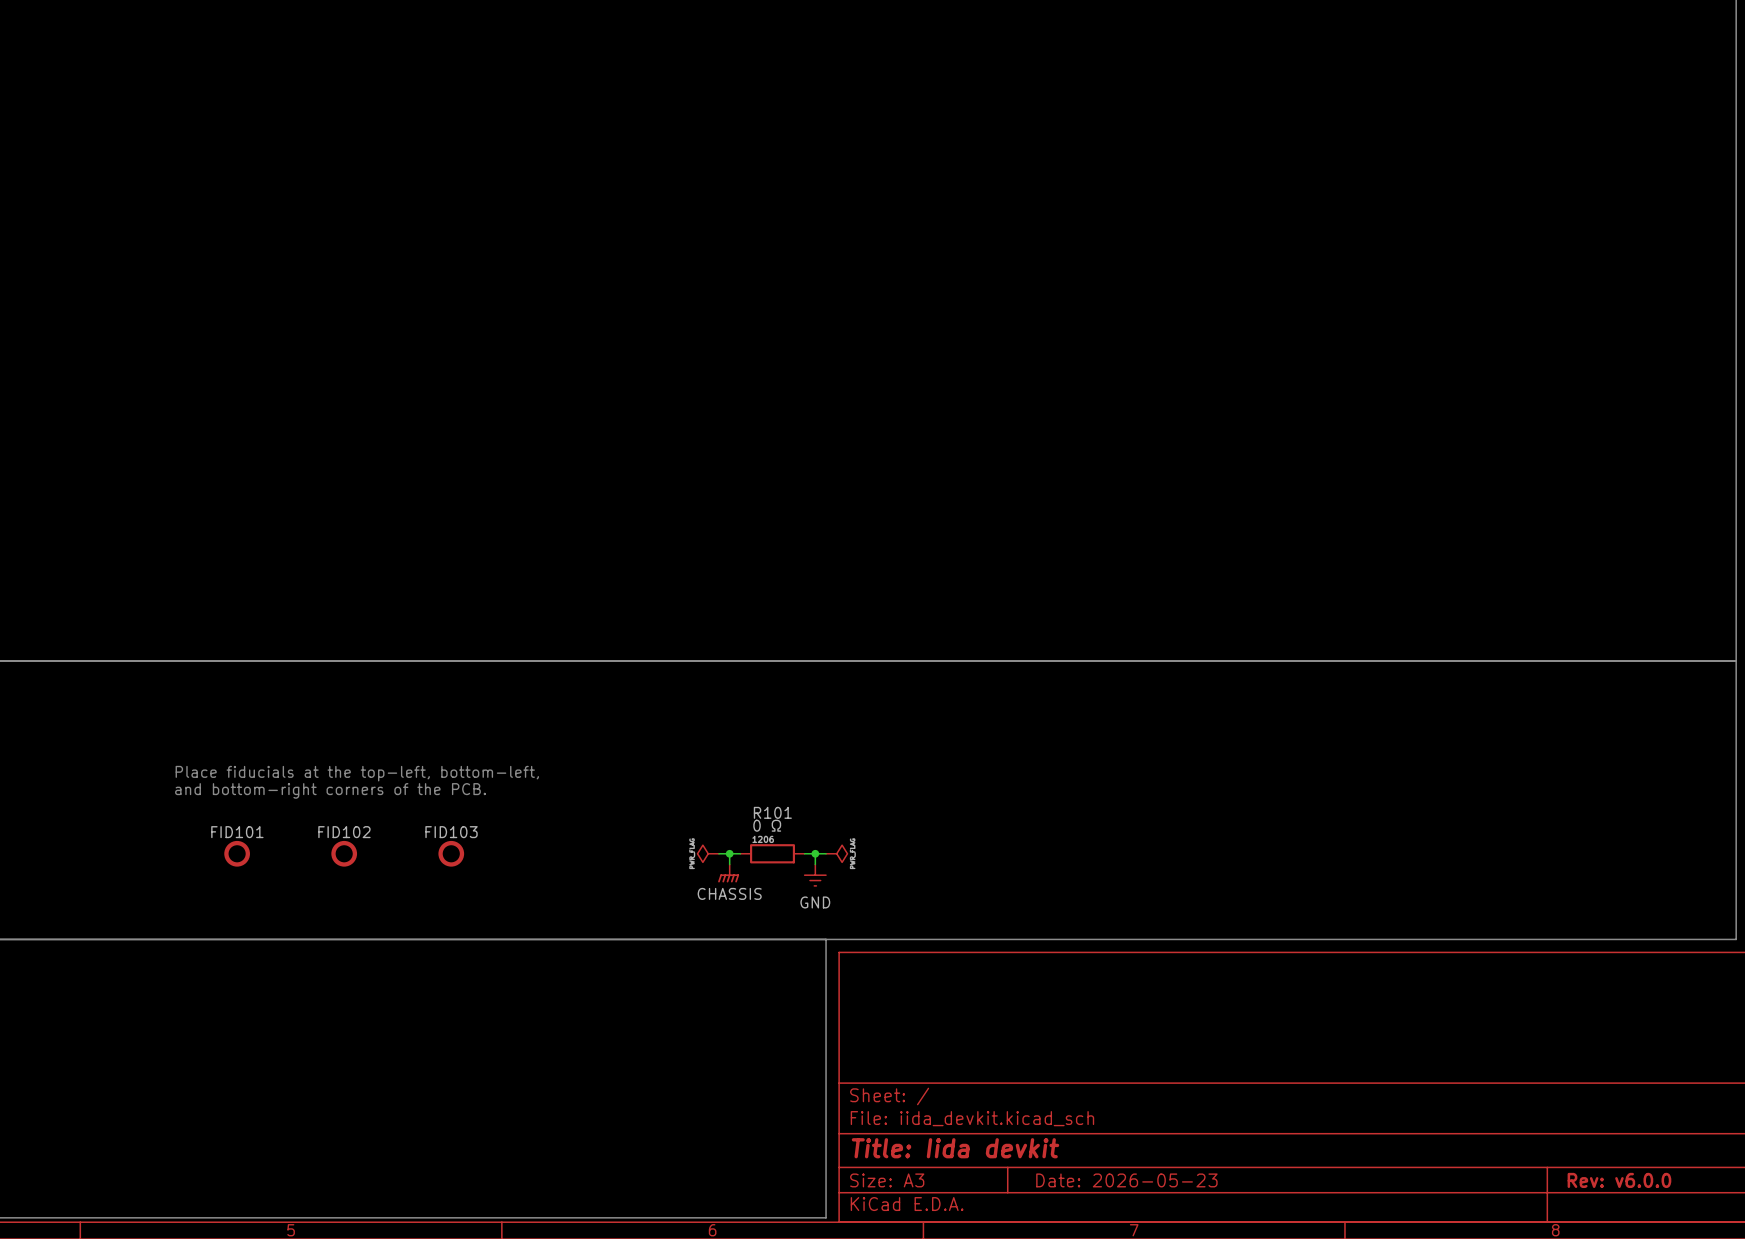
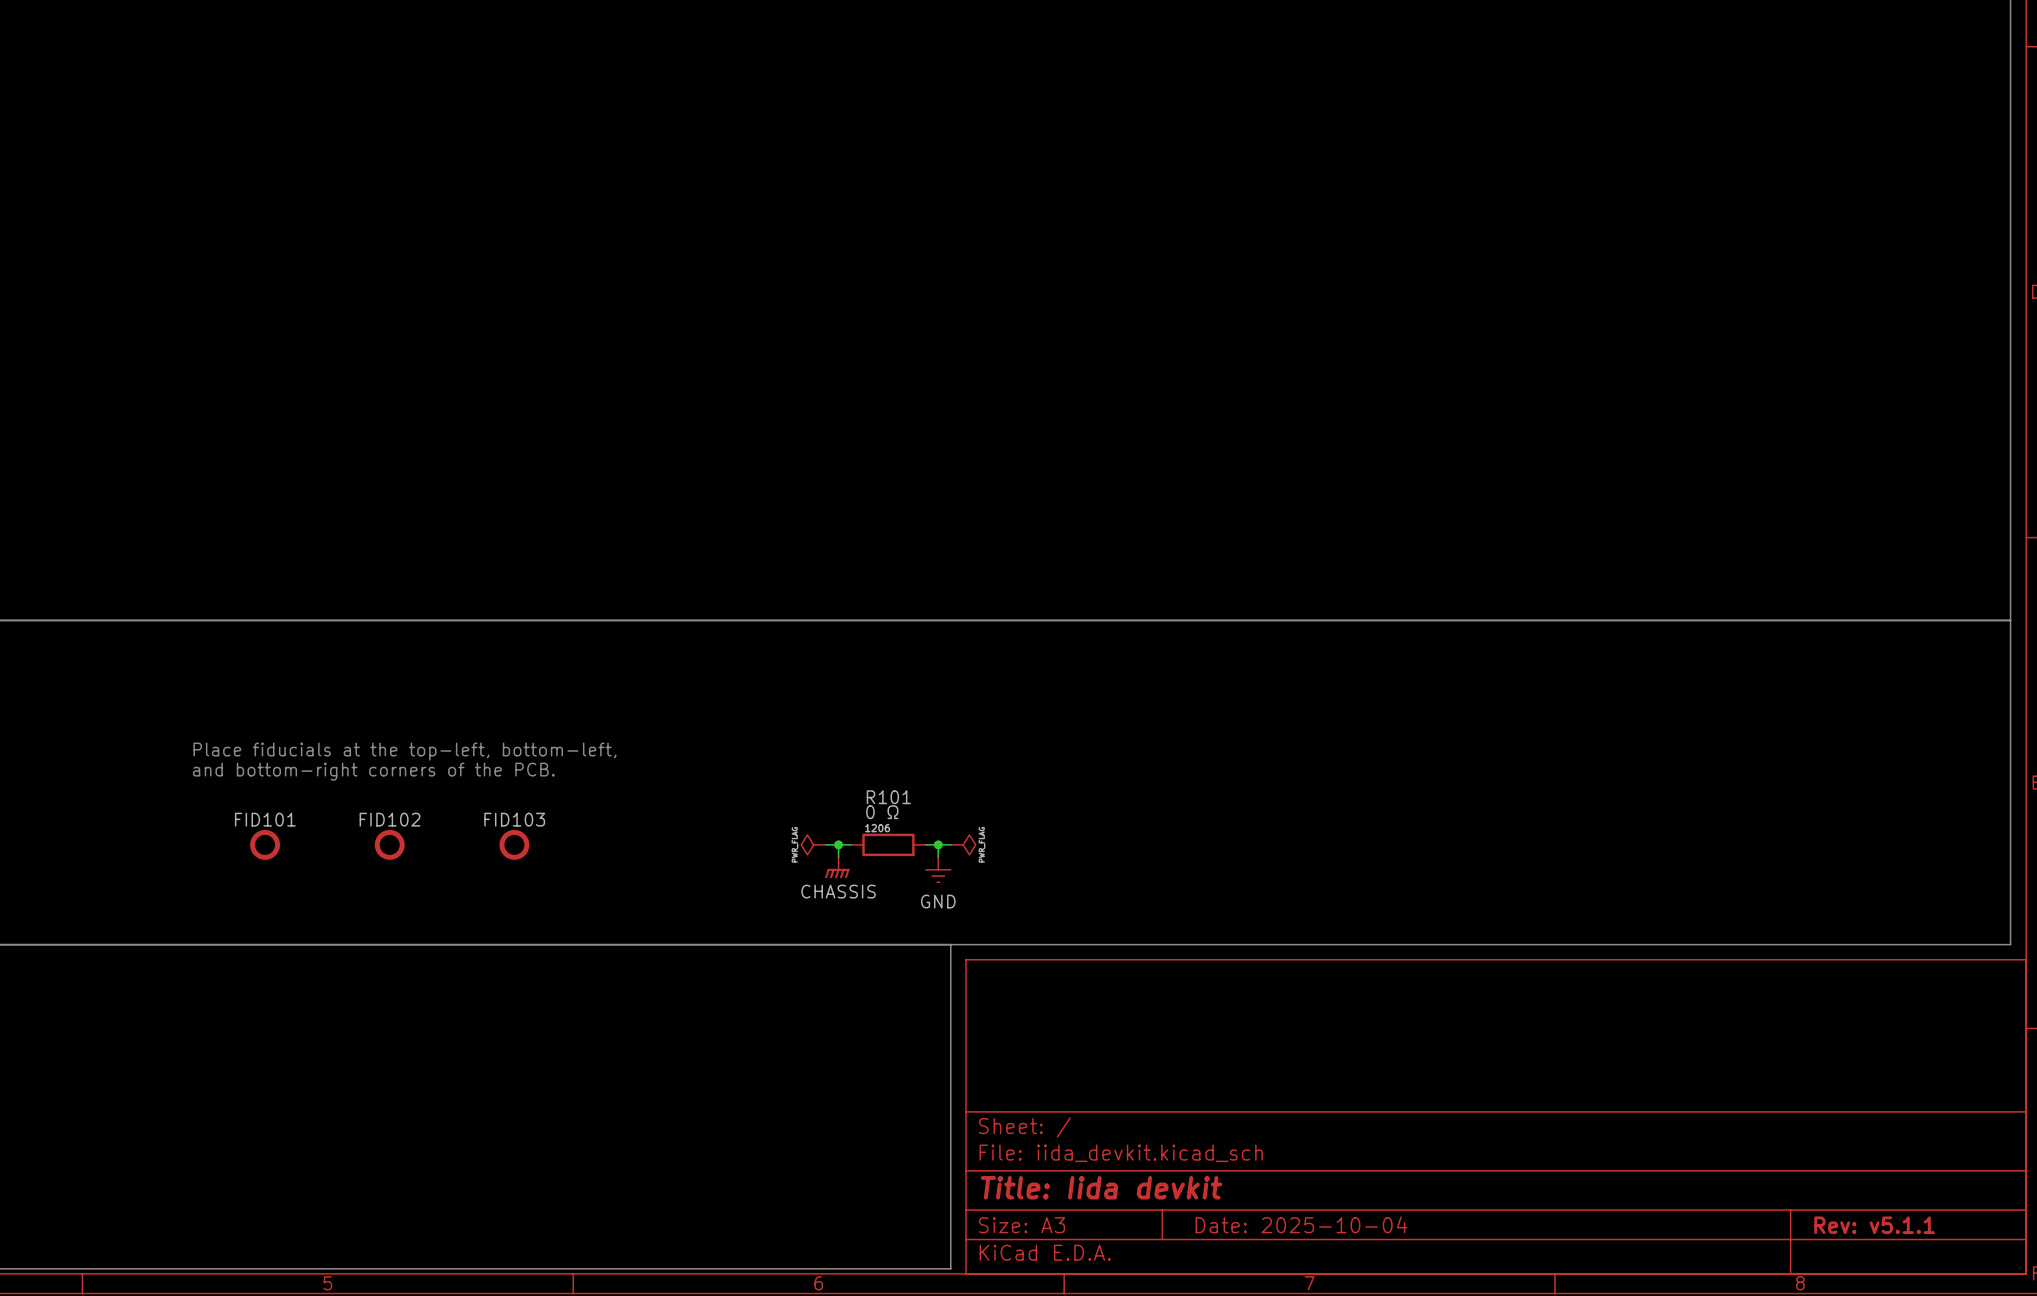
title block: Date: 2026-05-23 (1126, 1180) -> Date: 2025-10-04 (1301, 1224)
title block: Rev: v6.0.0 (1619, 1180) -> Rev: v5.1.1 (1874, 1225)

